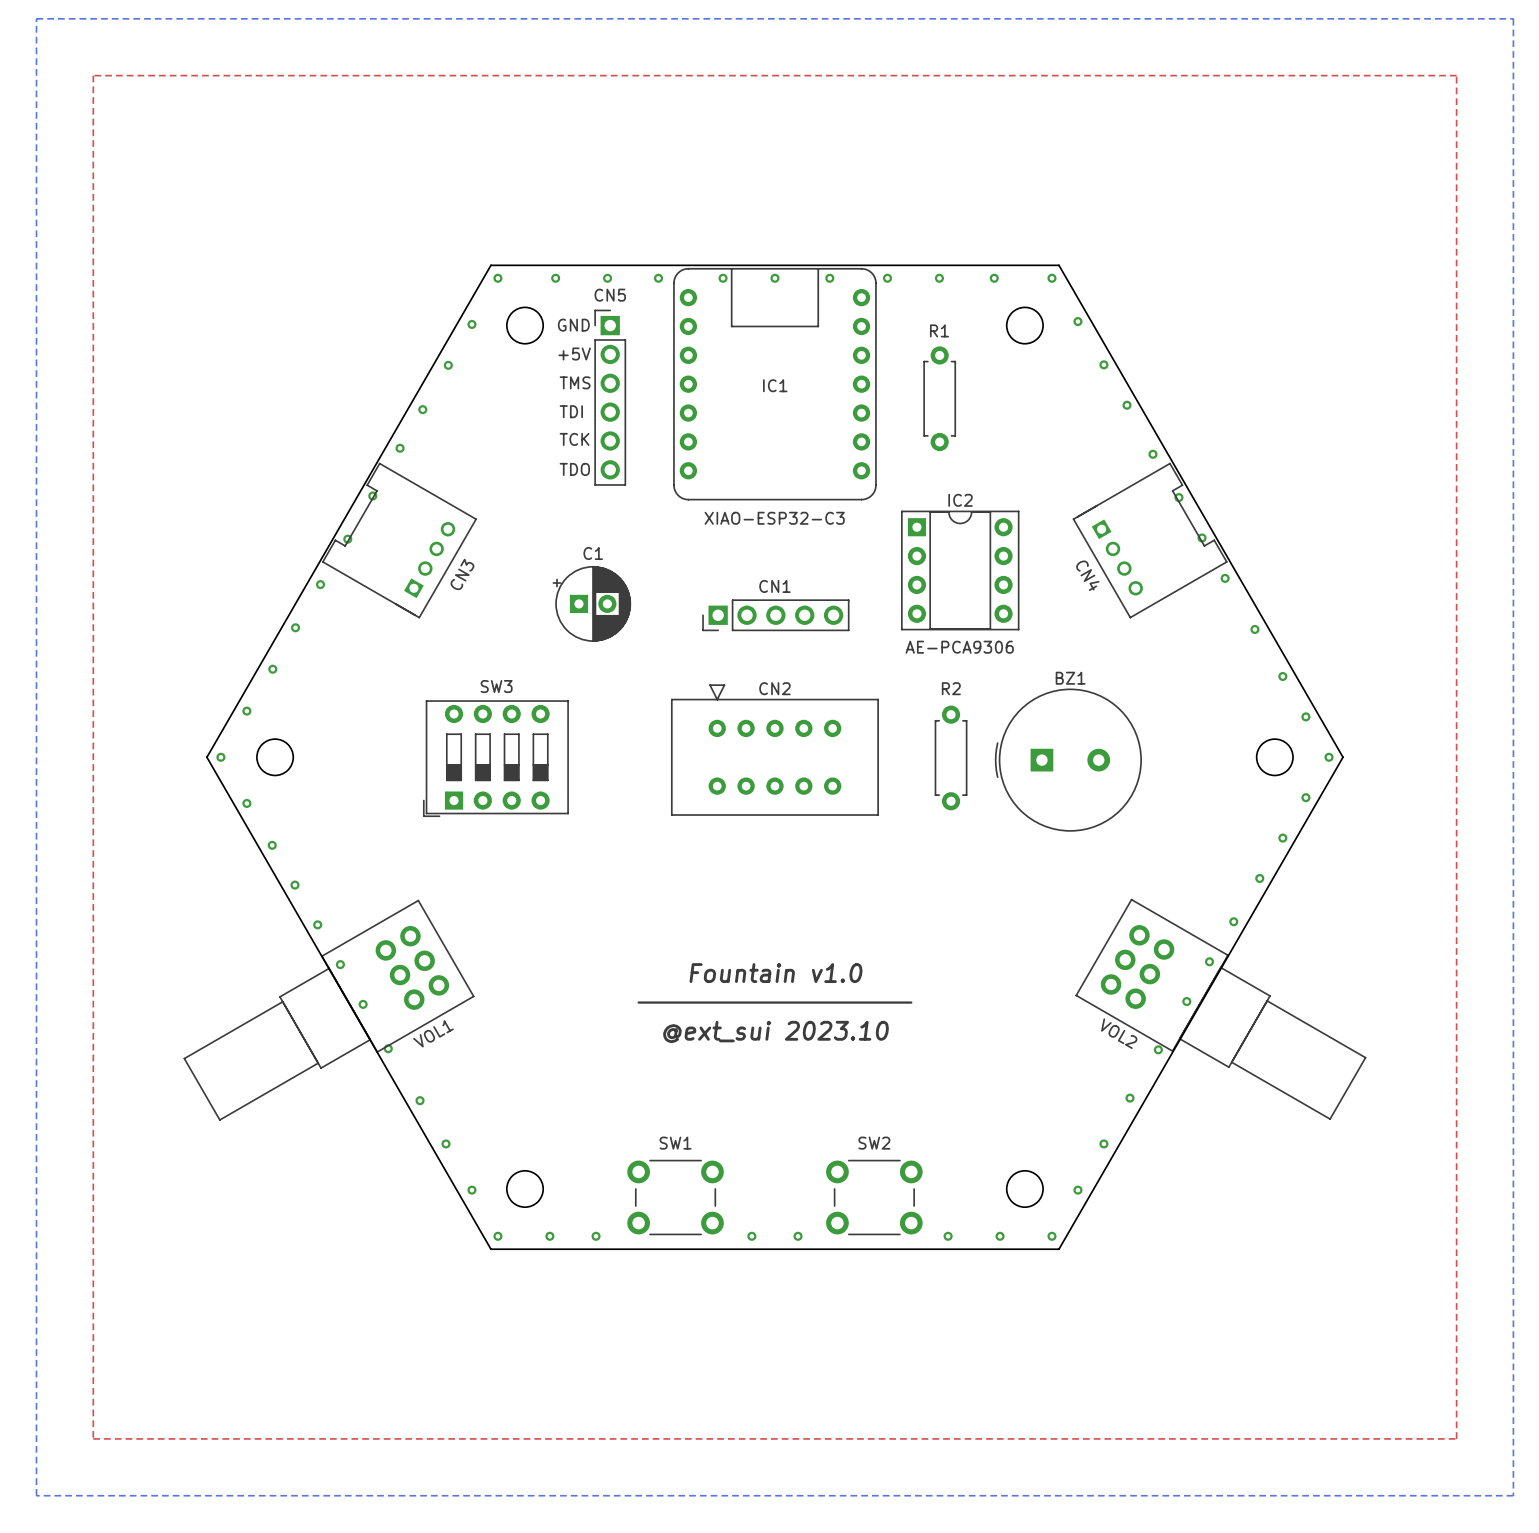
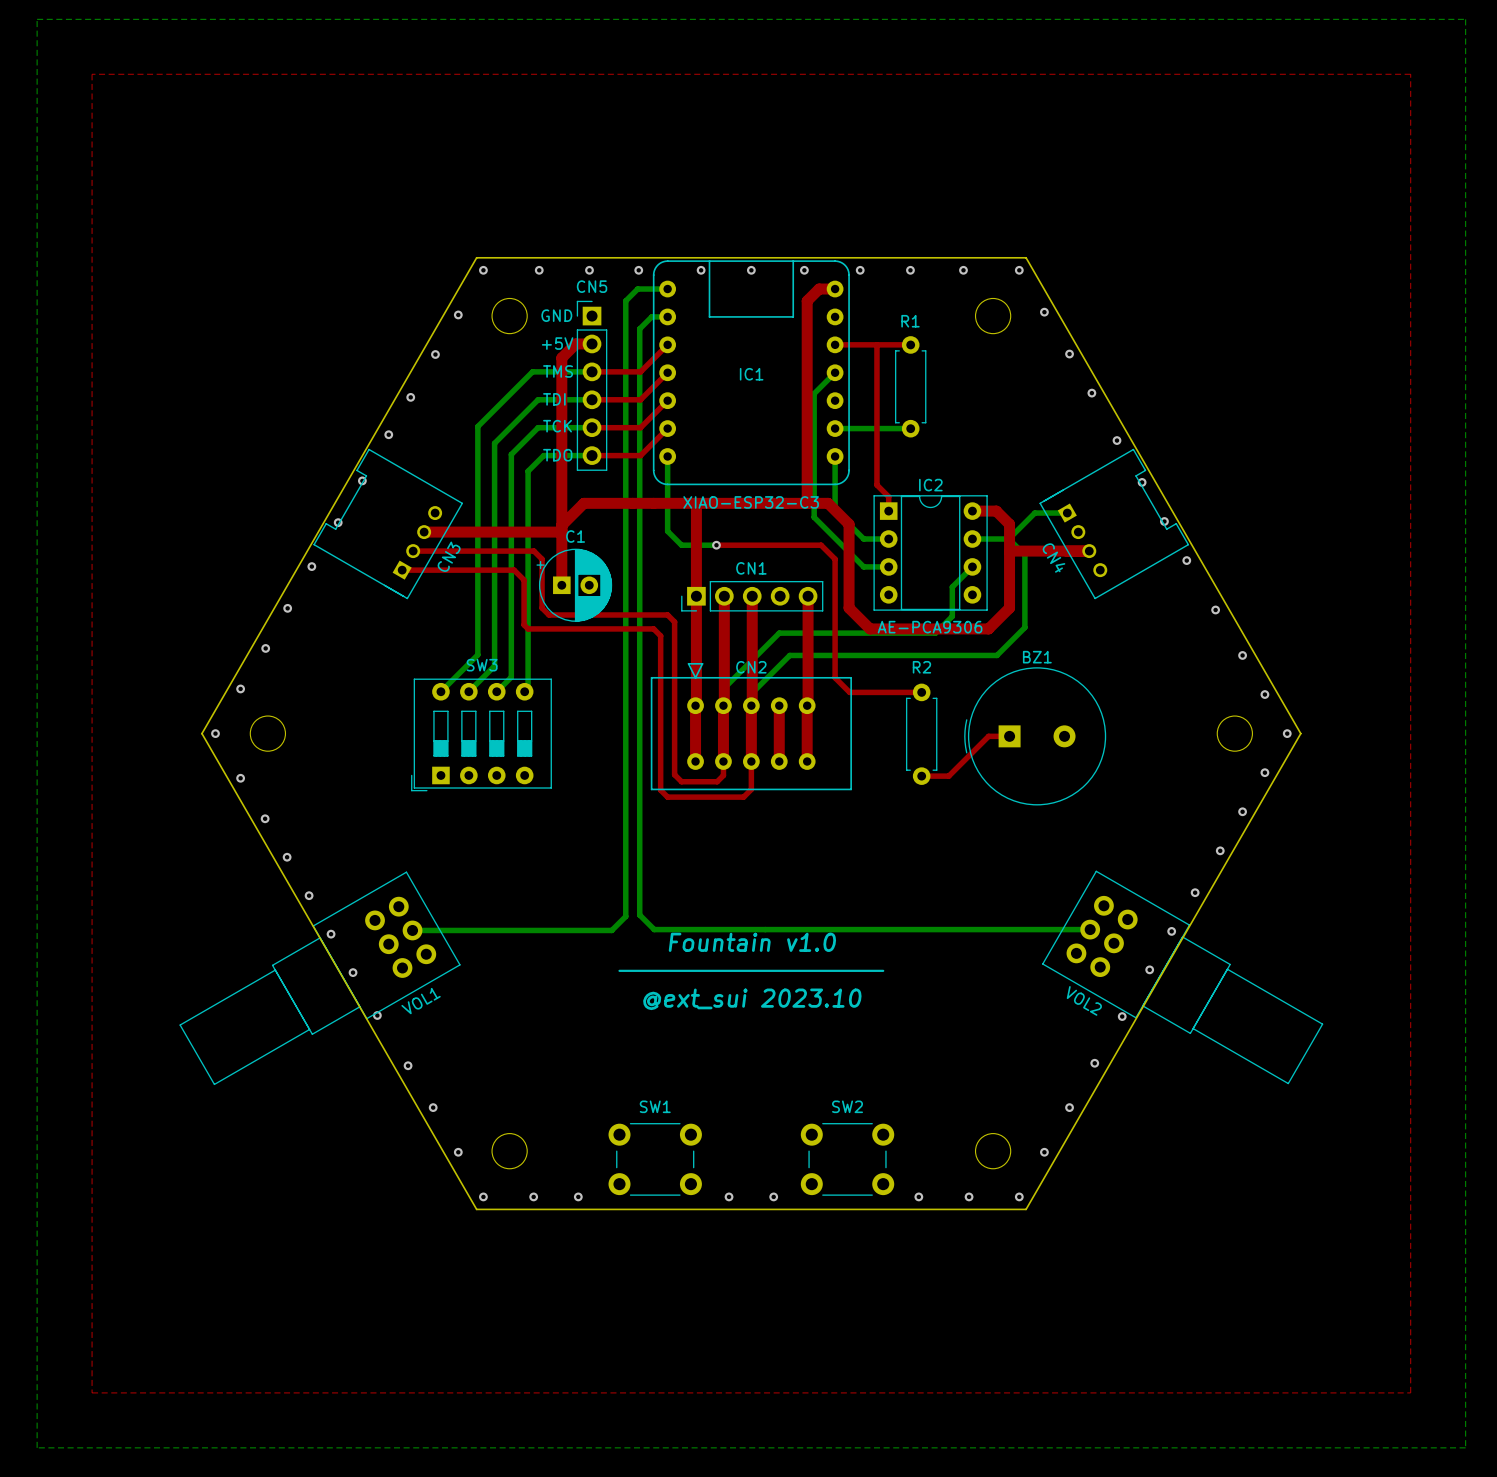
bottom track: none -> (667, 289) (637, 289) (625, 301) (625, 916) (611, 930) (412, 930)
top track: none -> (835, 289) (819, 289) (807, 301) (807, 503)
bottom track: none -> (667, 316) (651, 316) (639, 328) (639, 915) (654, 929) (1090, 929)
top track: none -> (592, 343) (575, 343) (561, 357) (561, 585)
top track: none -> (667, 344) (640, 371) (592, 371)
top track: none -> (835, 344) (910, 344)
top track: none -> (876, 344) (876, 485) (888, 496) (888, 511)
bottom track: none -> (592, 371) (532, 371) (477, 426) (477, 654) (440, 691)
top track: none -> (667, 372) (640, 399) (592, 399)
bottom track: none -> (835, 372) (814, 393) (814, 517) (863, 566) (888, 566)
bottom track: none -> (592, 399) (538, 399) (494, 443) (494, 666) (468, 691)
top track: none -> (667, 400) (640, 427) (592, 427)
bottom track: none -> (592, 427) (538, 427) (511, 454) (511, 677) (496, 691)
top track: none -> (667, 428) (640, 455) (592, 455)
bottom track: none -> (835, 428) (910, 428)
bottom track: none -> (592, 455) (543, 455) (528, 471) (528, 688) (524, 691)
bottom track: none -> (667, 456) (667, 531) (681, 545) (716, 545)
bottom track: none -> (835, 456) (835, 510) (863, 539) (888, 539)
top track: none -> (695, 503) (695, 761)
top track: none -> (972, 511) (996, 511) (1009, 524) (1009, 608) (988, 628) (869, 628) (849, 608) (849, 524) (828, 503) (583, 503) (561, 525)
bottom track: none -> (1067, 513) (1034, 513) (1008, 539)
top track: none -> (561, 531) (424, 532)
bottom track: none -> (972, 539) (1008, 539)
bottom track: none -> (1008, 539) (1024, 554) (1024, 627) (996, 655) (789, 655) (751, 693) (751, 705)
top track: none -> (716, 545) (821, 545) (835, 559) (835, 677) (849, 692) (921, 692)
via: none -> (716, 545)
top track: none -> (413, 551) (533, 551) (542, 559) (542, 608) (549, 614) (667, 614) (674, 621) (674, 774) (681, 781) (717, 781) (723, 775) (724, 596)
top track: none -> (1089, 551) (1009, 552)
bottom track: none -> (972, 566) (952, 587) (952, 616) (935, 633) (779, 633) (723, 688) (723, 705)
top track: none -> (402, 570) (514, 570) (524, 580) (524, 624) (528, 628) (653, 628) (660, 635) (660, 790) (667, 797) (743, 797) (751, 789) (752, 596)
top track: none -> (808, 596) (807, 761)
top track: none -> (779, 705) (779, 761)
top track: none -> (1009, 736) (988, 736) (948, 776) (921, 776)

